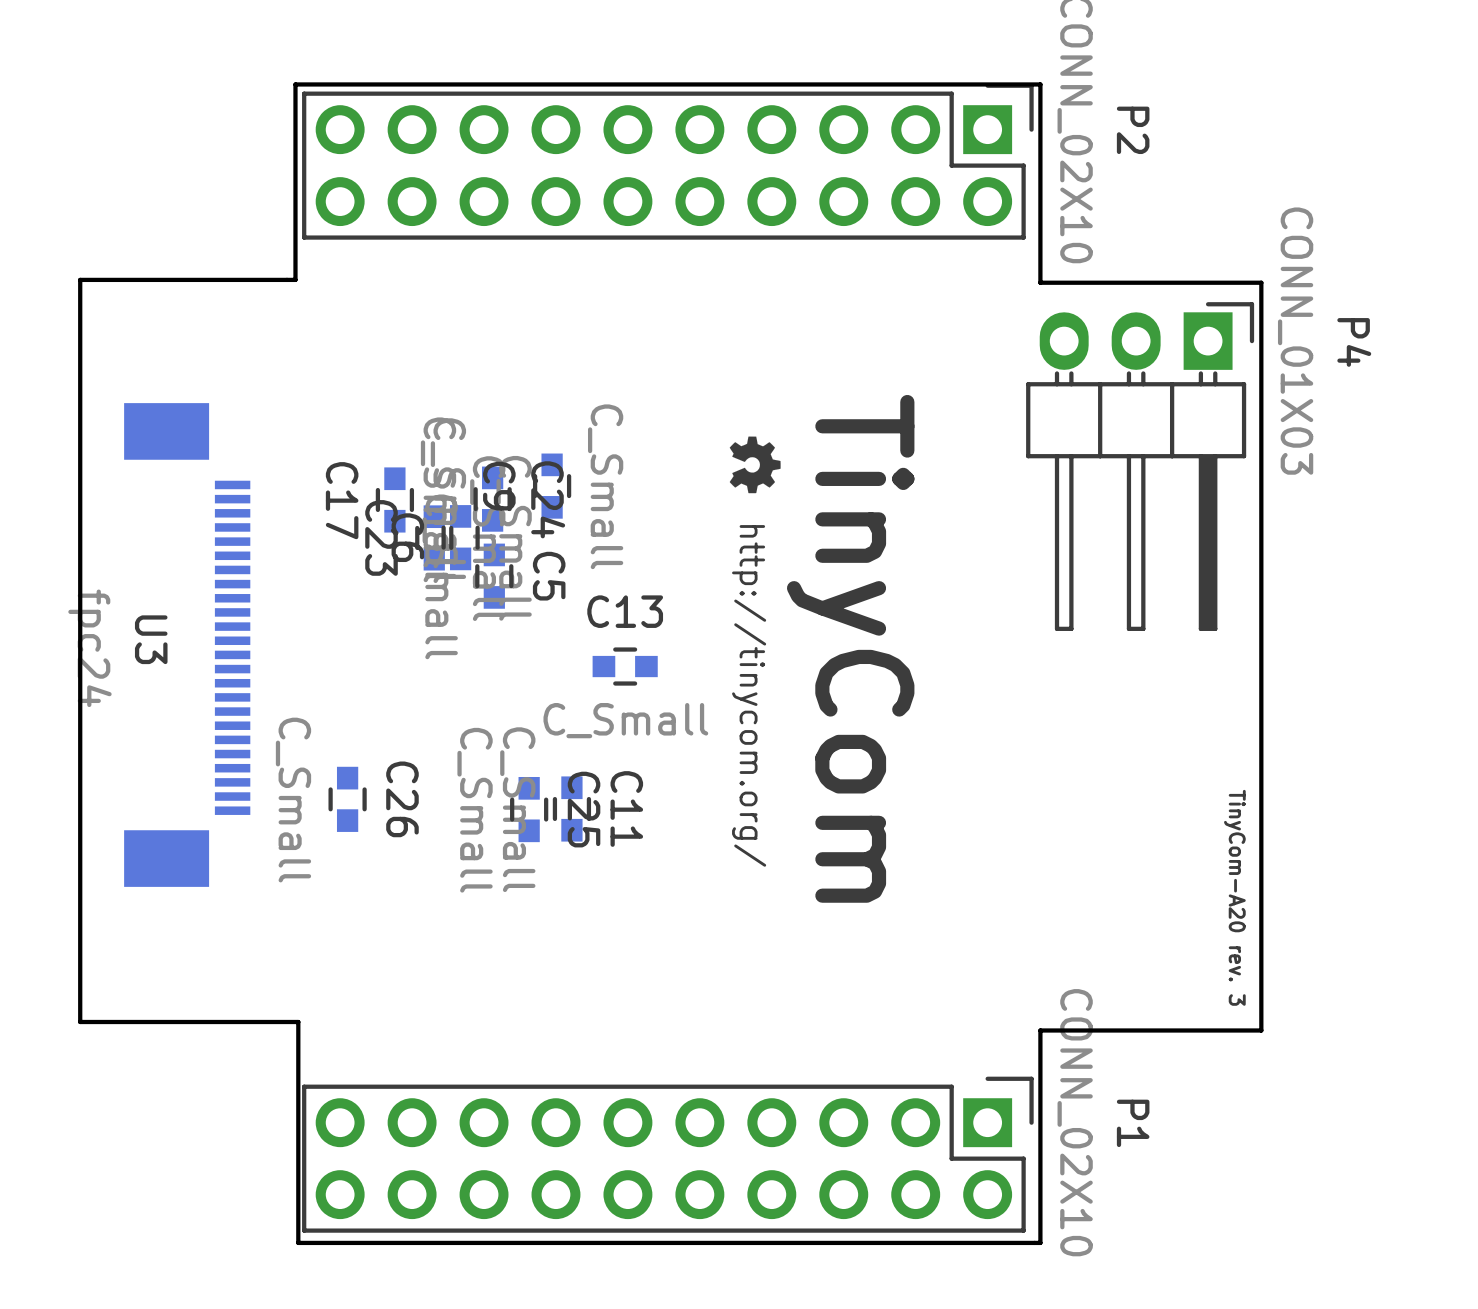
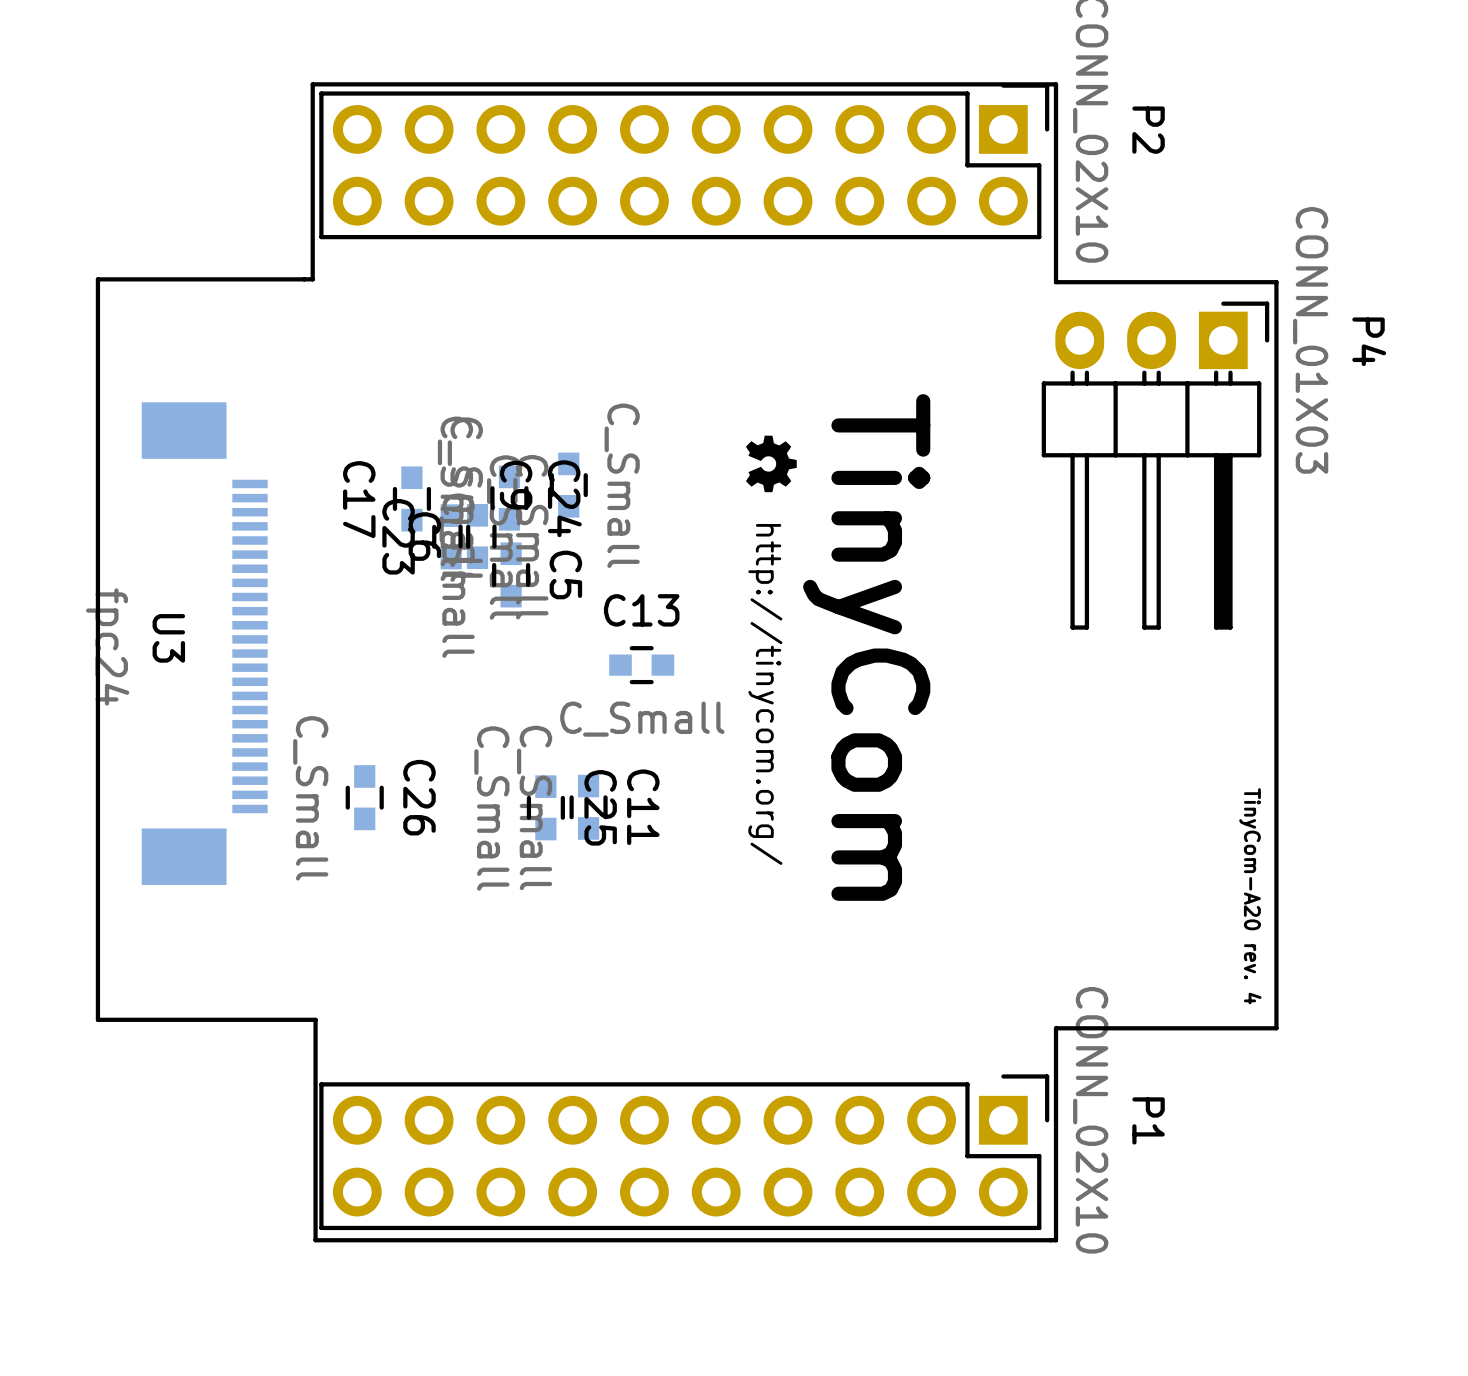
text: TinyCom-A20 rev. 3 (1234, 897) -> TinyCom-A20 rev. 4 (1250, 896)

